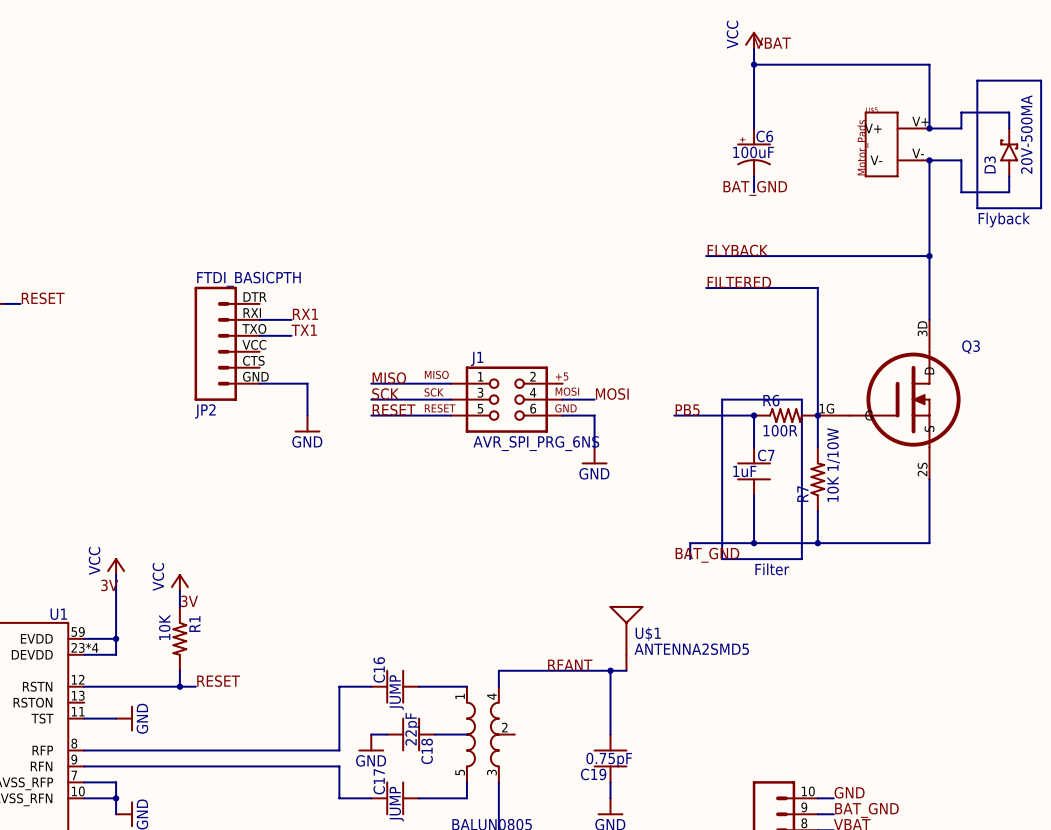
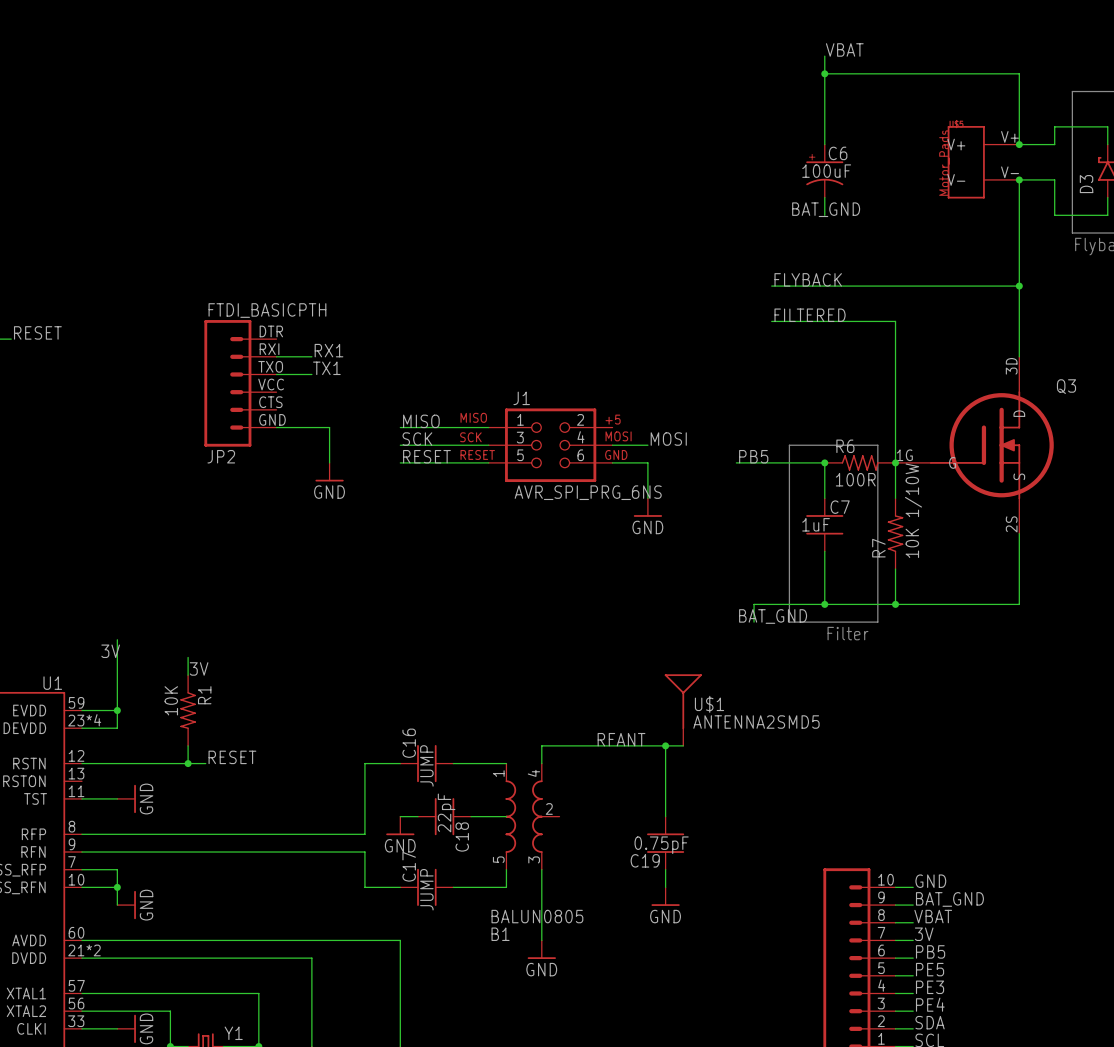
power symbol: VCC (754, 40) -> none
power symbol: VCC (116, 566) -> none
power symbol: VCC (179, 582) -> none

